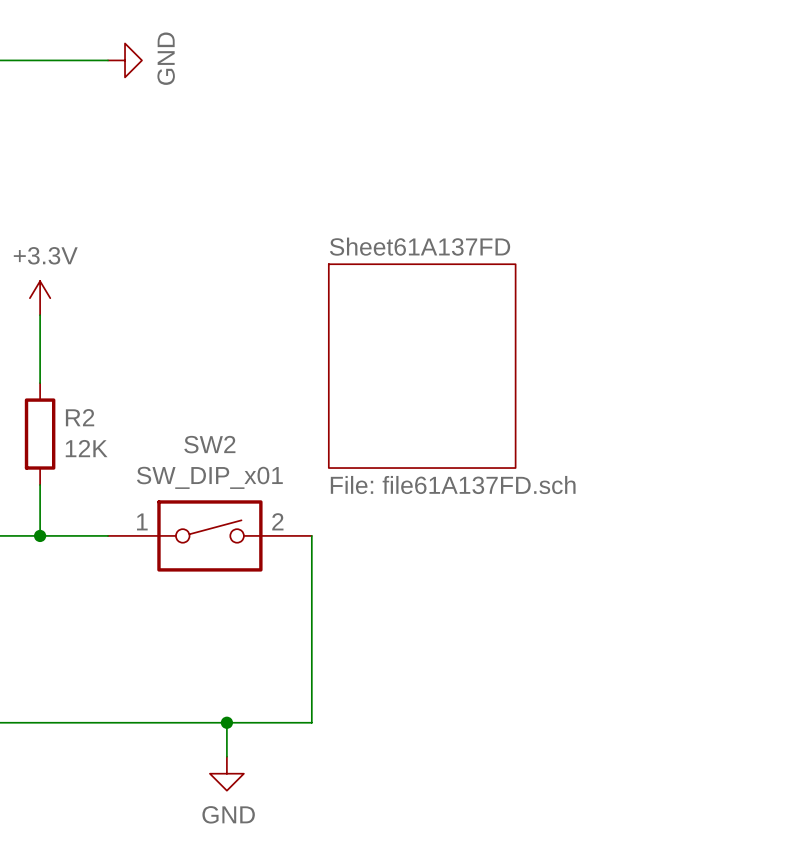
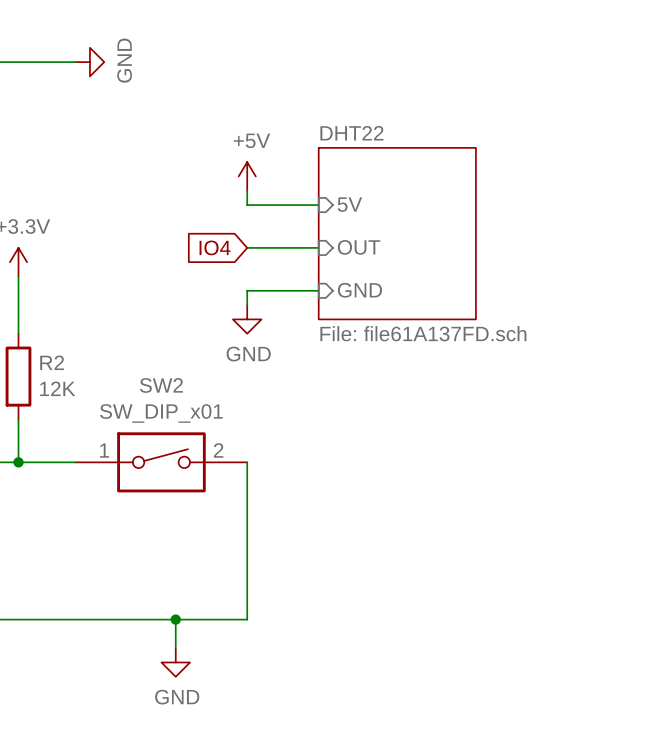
power symbol: none -> +5V (247, 176)
wire: none -> (247, 190) (247, 205) (318, 205)
sheet pin: none -> 5V (349, 204)
sheet DHT22: none -> File: file61A137FD.sch (397, 233)
sheet pin: none -> OUT (359, 247)
global label: none -> IO4 (215, 247)
wire: none -> (247, 247) (318, 247)
sheet pin: none -> GND (359, 290)
wire: none -> (318, 290) (247, 290) (247, 305)
power symbol: none -> GND (247, 319)
sheet Sheet61A137FD: File: file61A137FD.sch (422, 366) -> none

